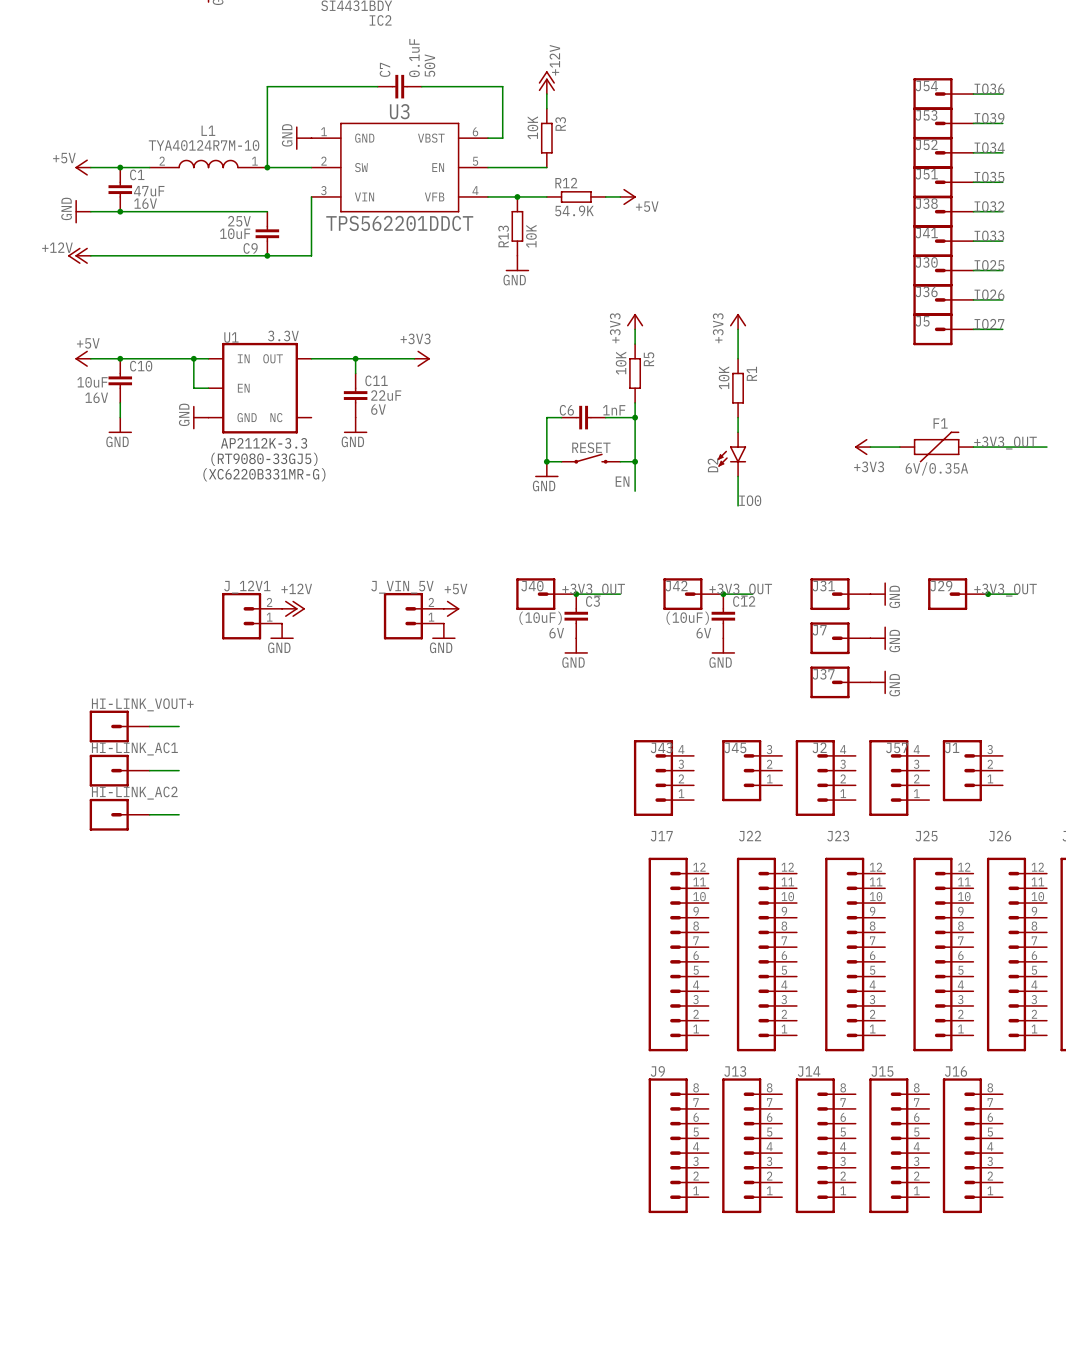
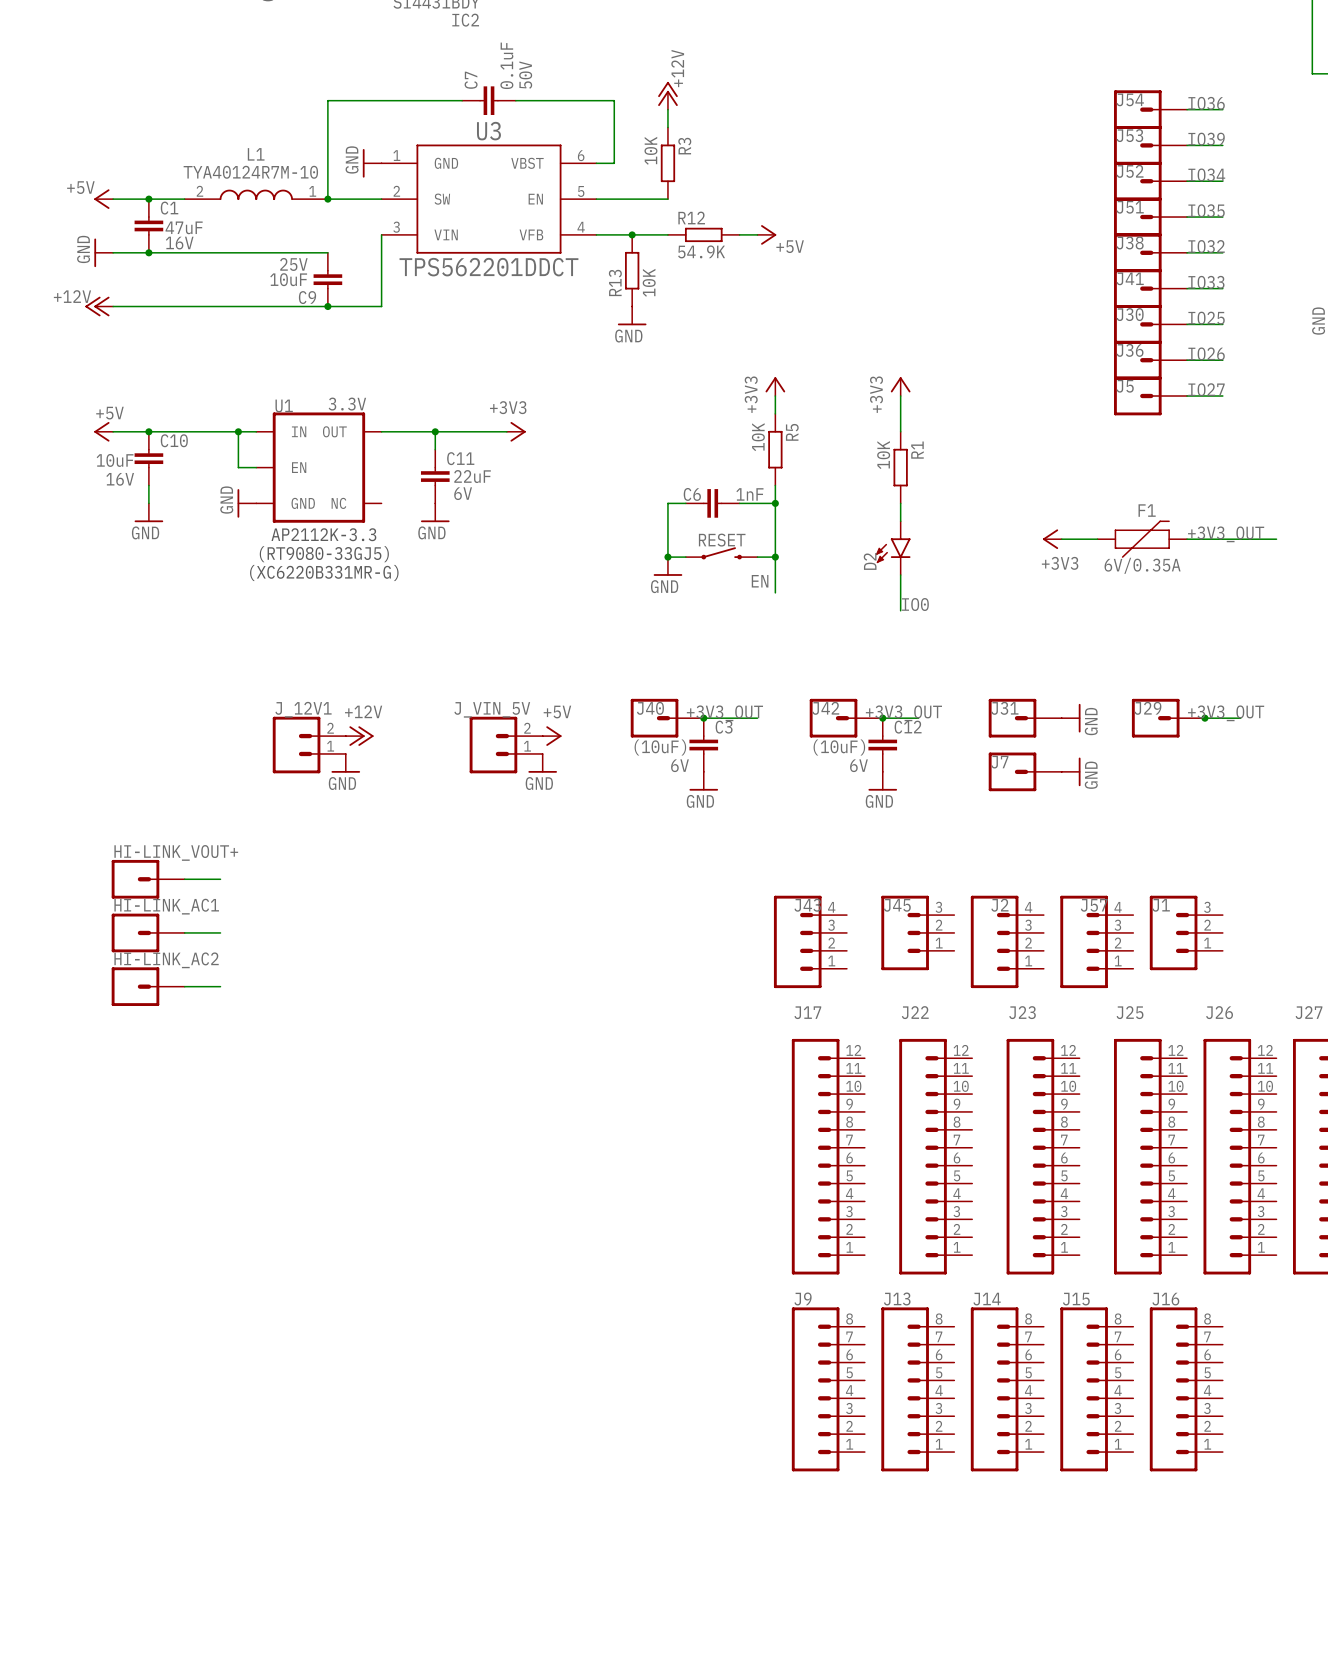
J37: (840, 682) -> none
power symbol: GND (878, 682) -> none

